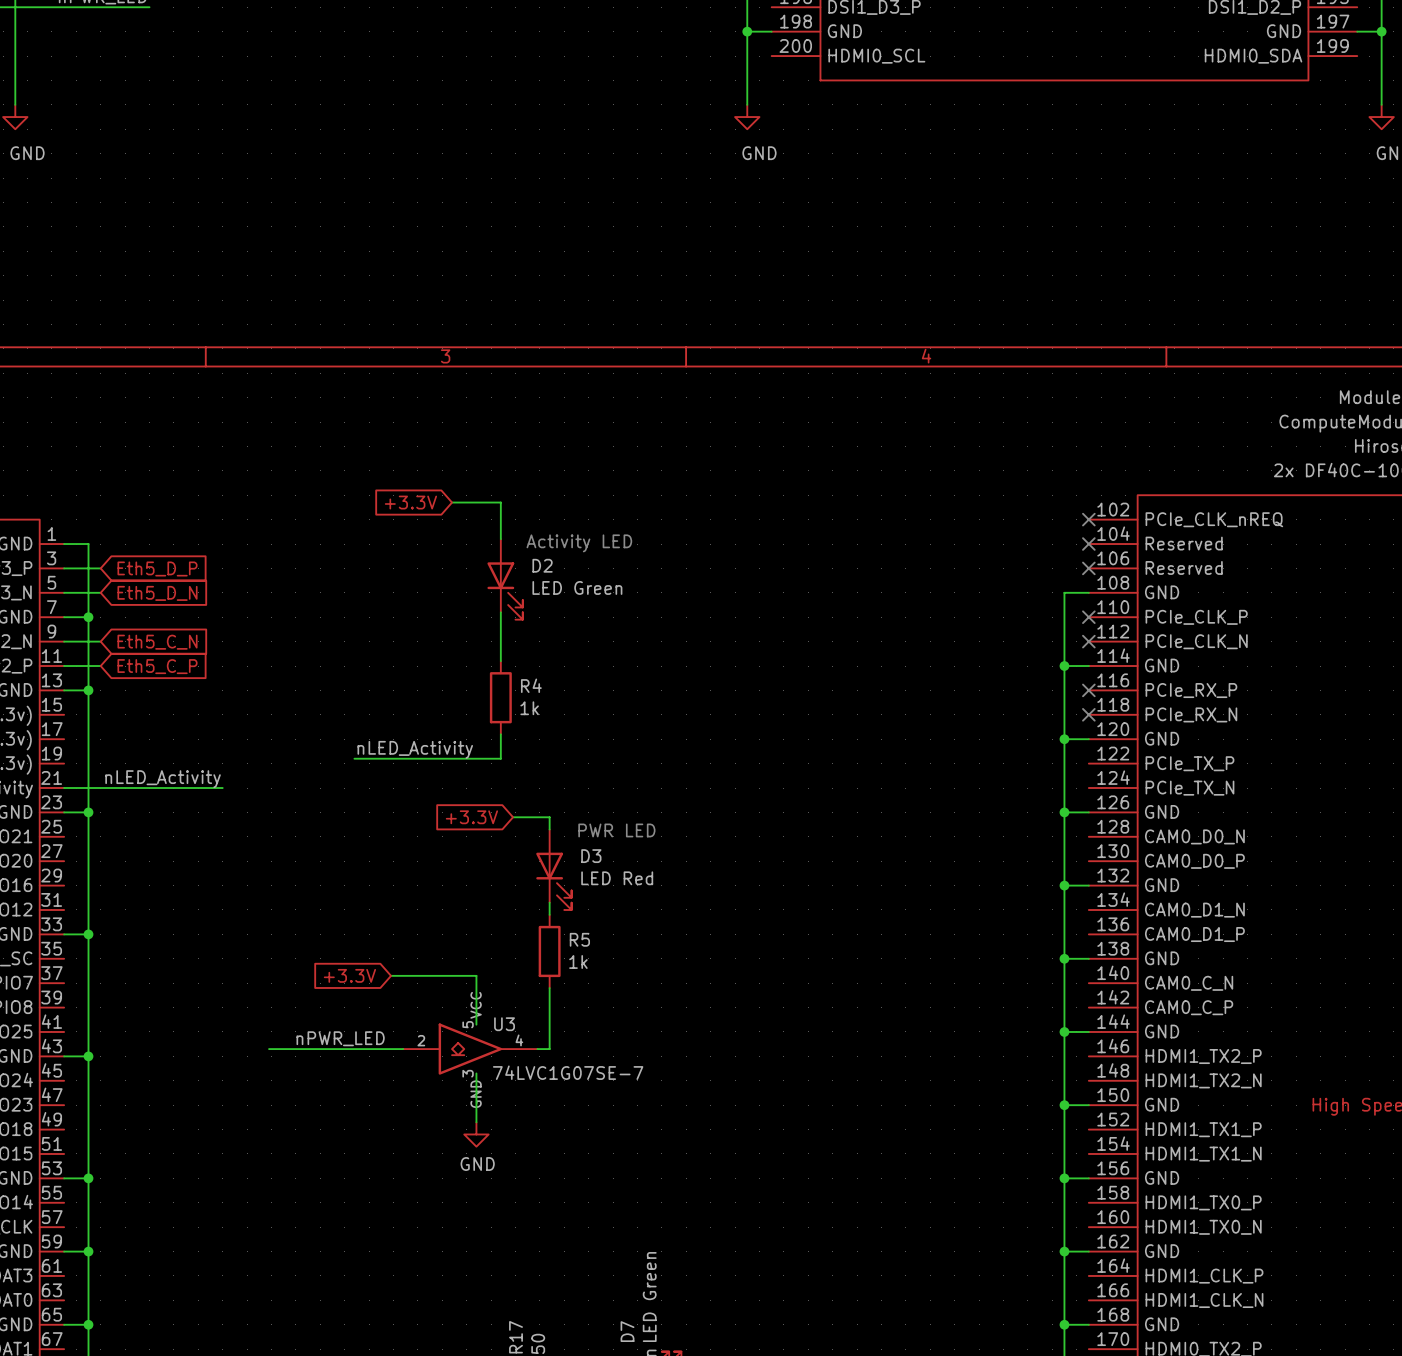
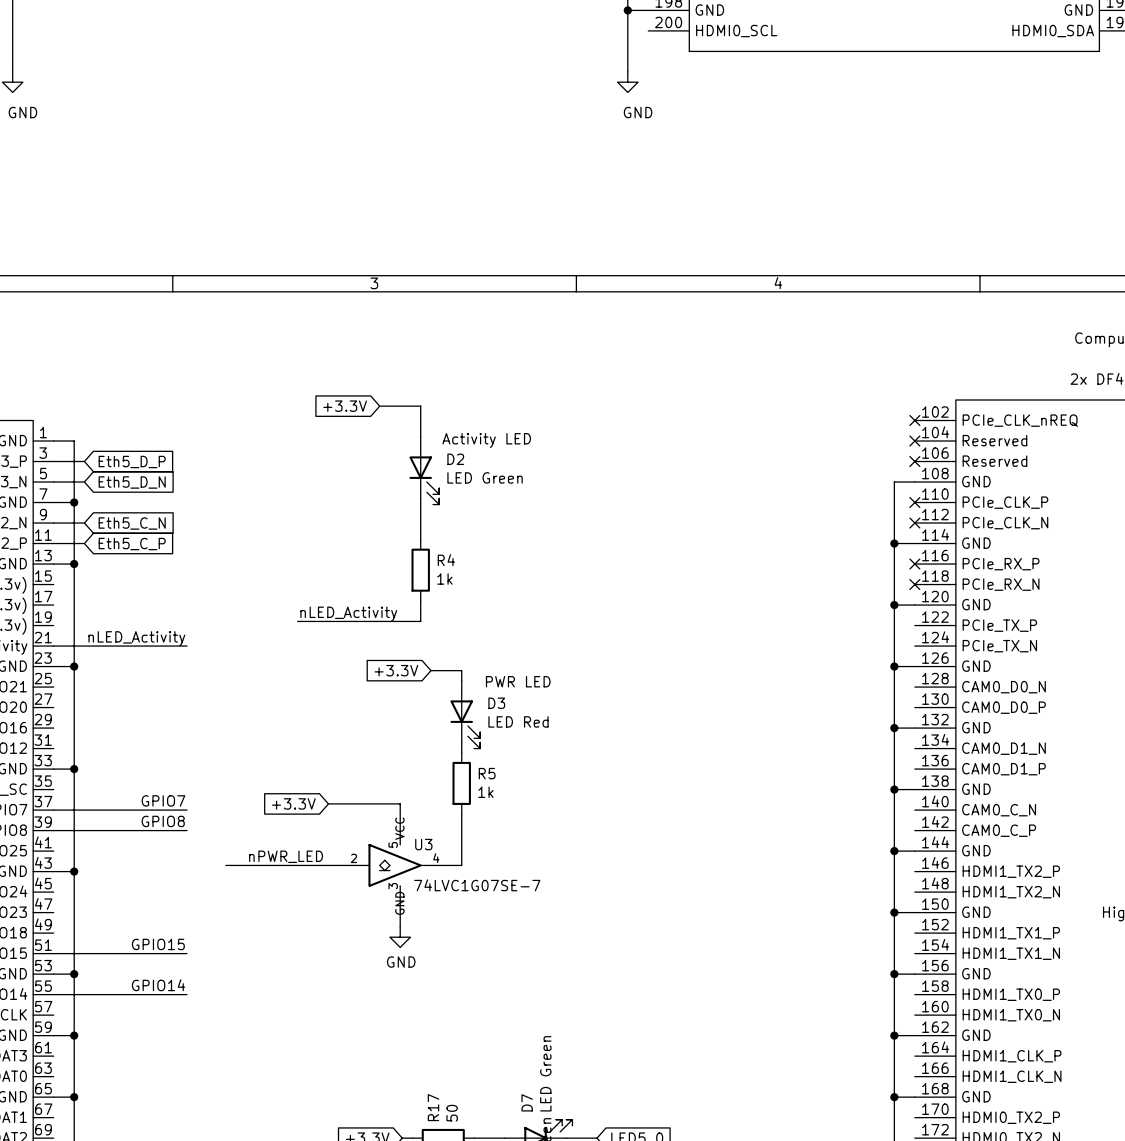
label: none -> GPIO7 (163, 800)
wire: none -> (53, 810) (186, 810)
label: none -> GPIO8 (163, 821)
wire: none -> (53, 830) (186, 830)
label: none -> GPIO15 (158, 944)
wire: none -> (53, 953) (186, 953)
label: none -> GPIO14 (158, 985)
wire: none -> (53, 994) (186, 994)

